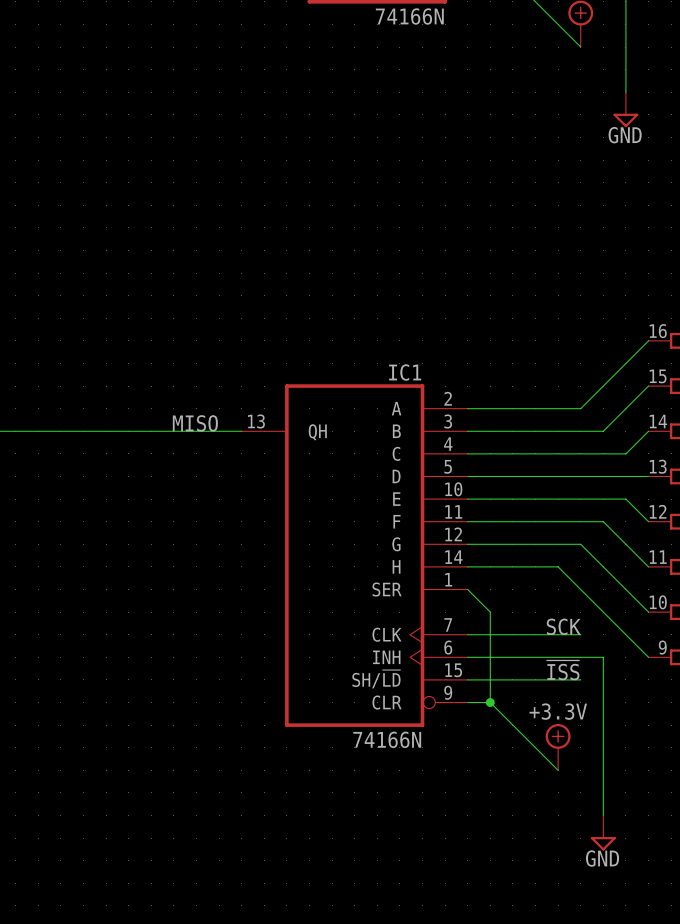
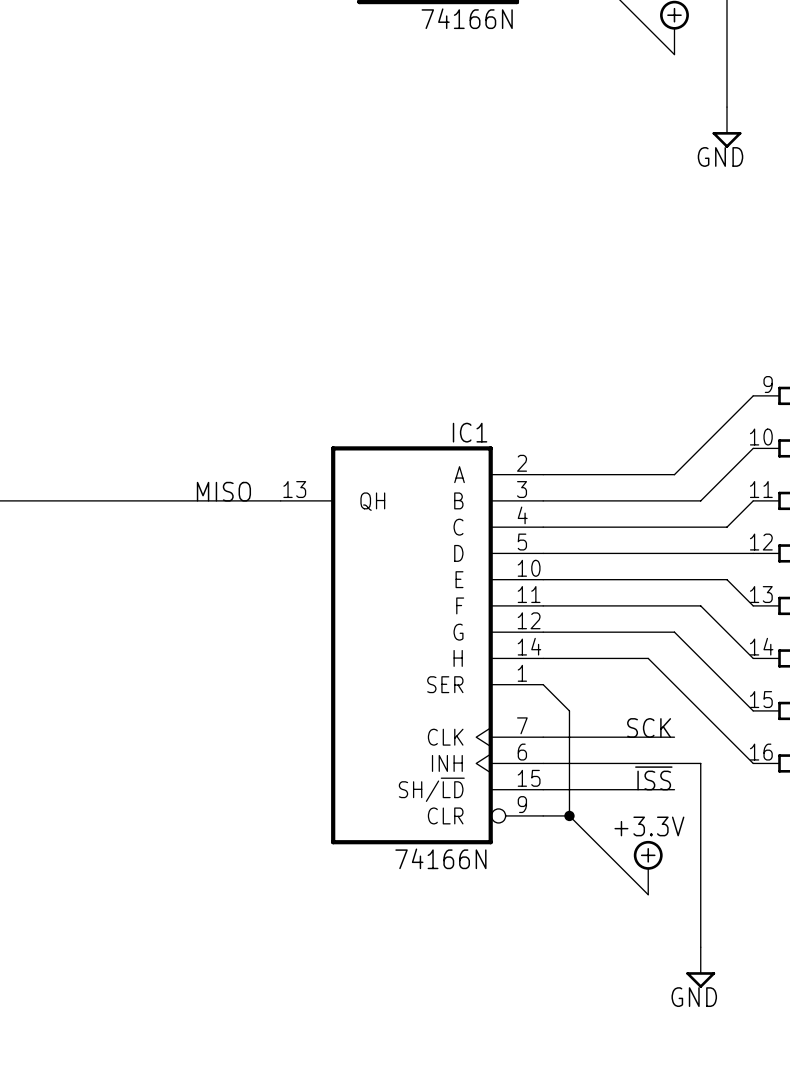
part pin number: 16 (658, 331) -> 9 (768, 384)
part pin number: 15 (658, 376) -> 10 (761, 437)
part pin number: 14 (658, 421) -> 11 (761, 489)
part pin number: 13 (658, 466) -> 12 (761, 542)
part pin number: 12 (658, 511) -> 13 (761, 594)
part pin number: 11 (658, 557) -> 14 (761, 646)
part pin number: 10 (658, 602) -> 15 (761, 699)
part pin number: 9 (662, 647) -> 16 (761, 752)

